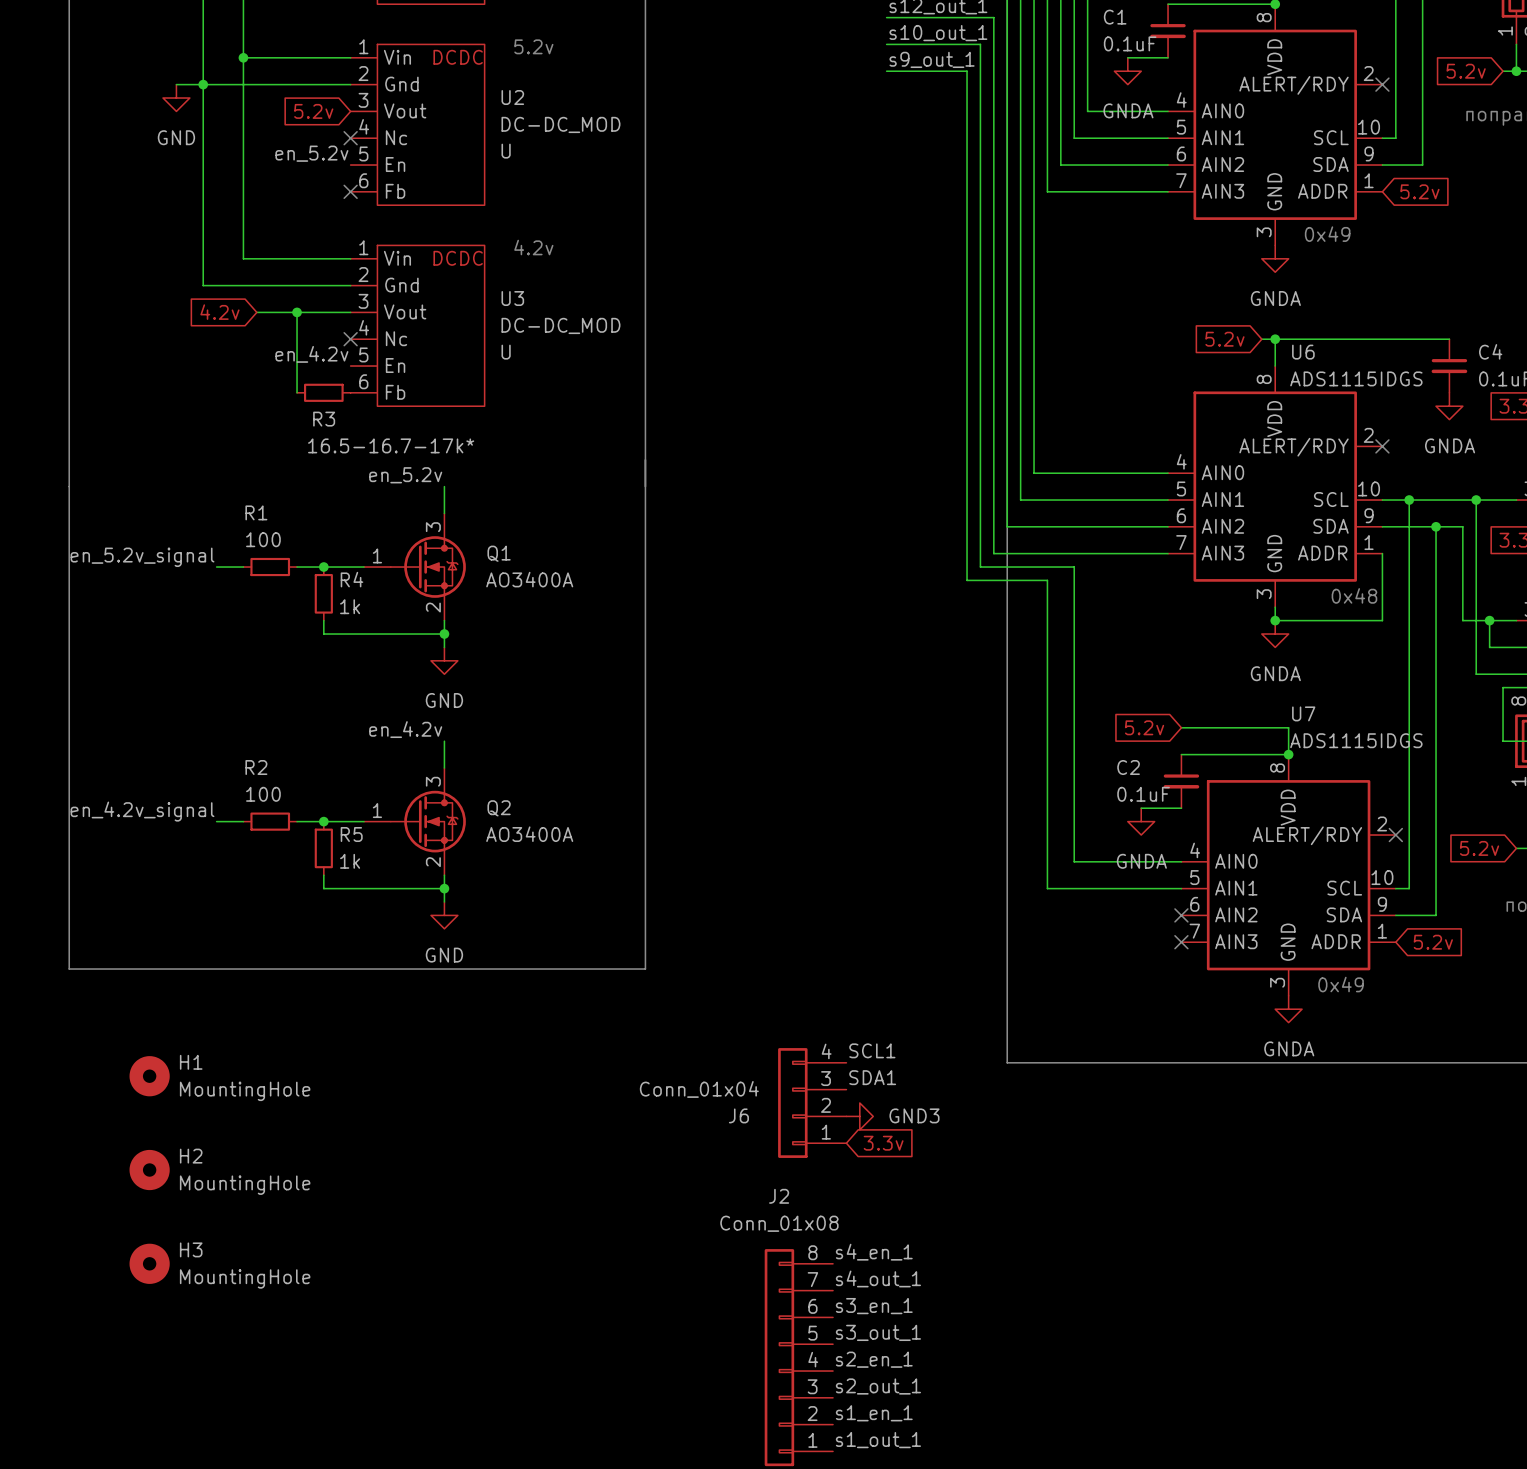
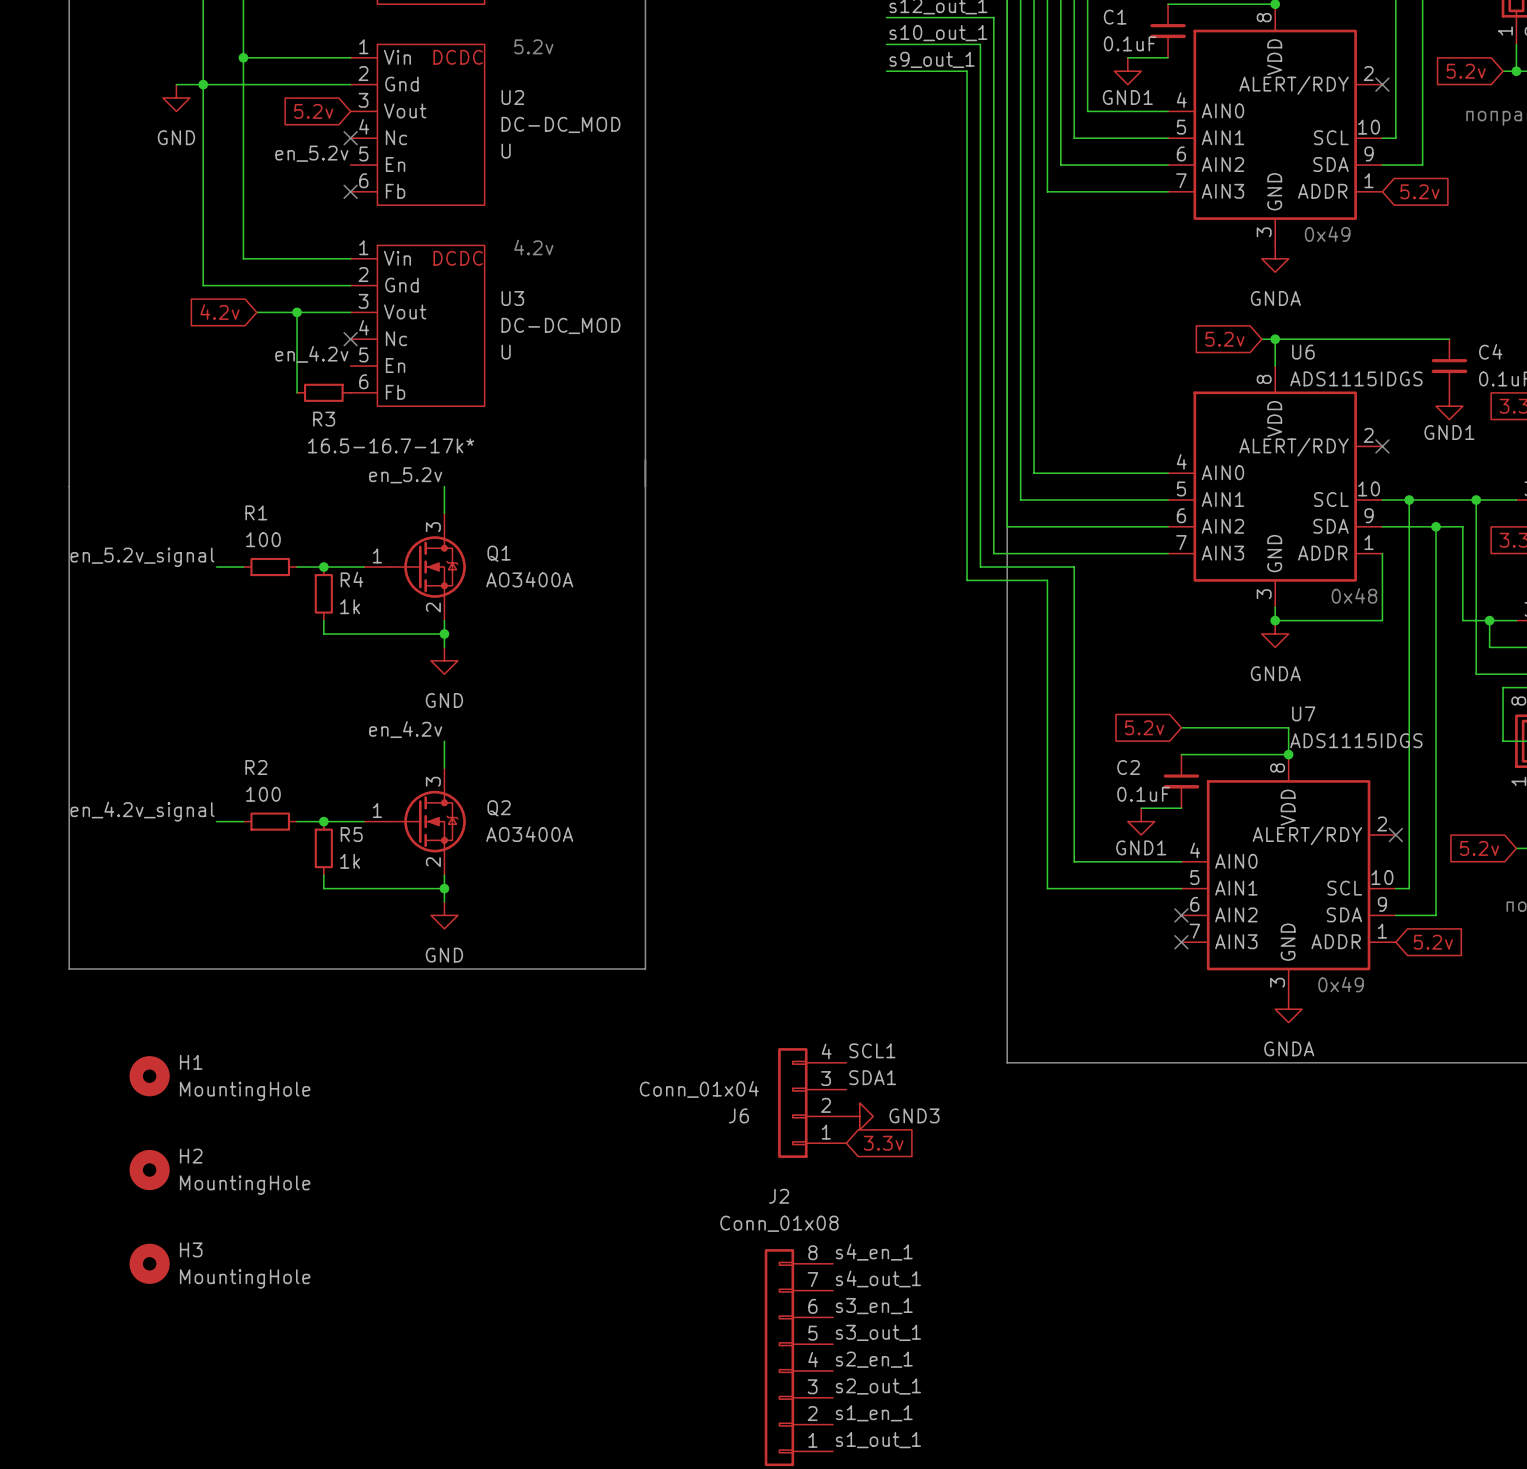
power symbol: GNDA (1127, 71) -> GND1 (1127, 71)
power symbol: GNDA (1449, 406) -> GND1 (1449, 406)
power symbol: GNDA (1141, 821) -> GND1 (1141, 821)

